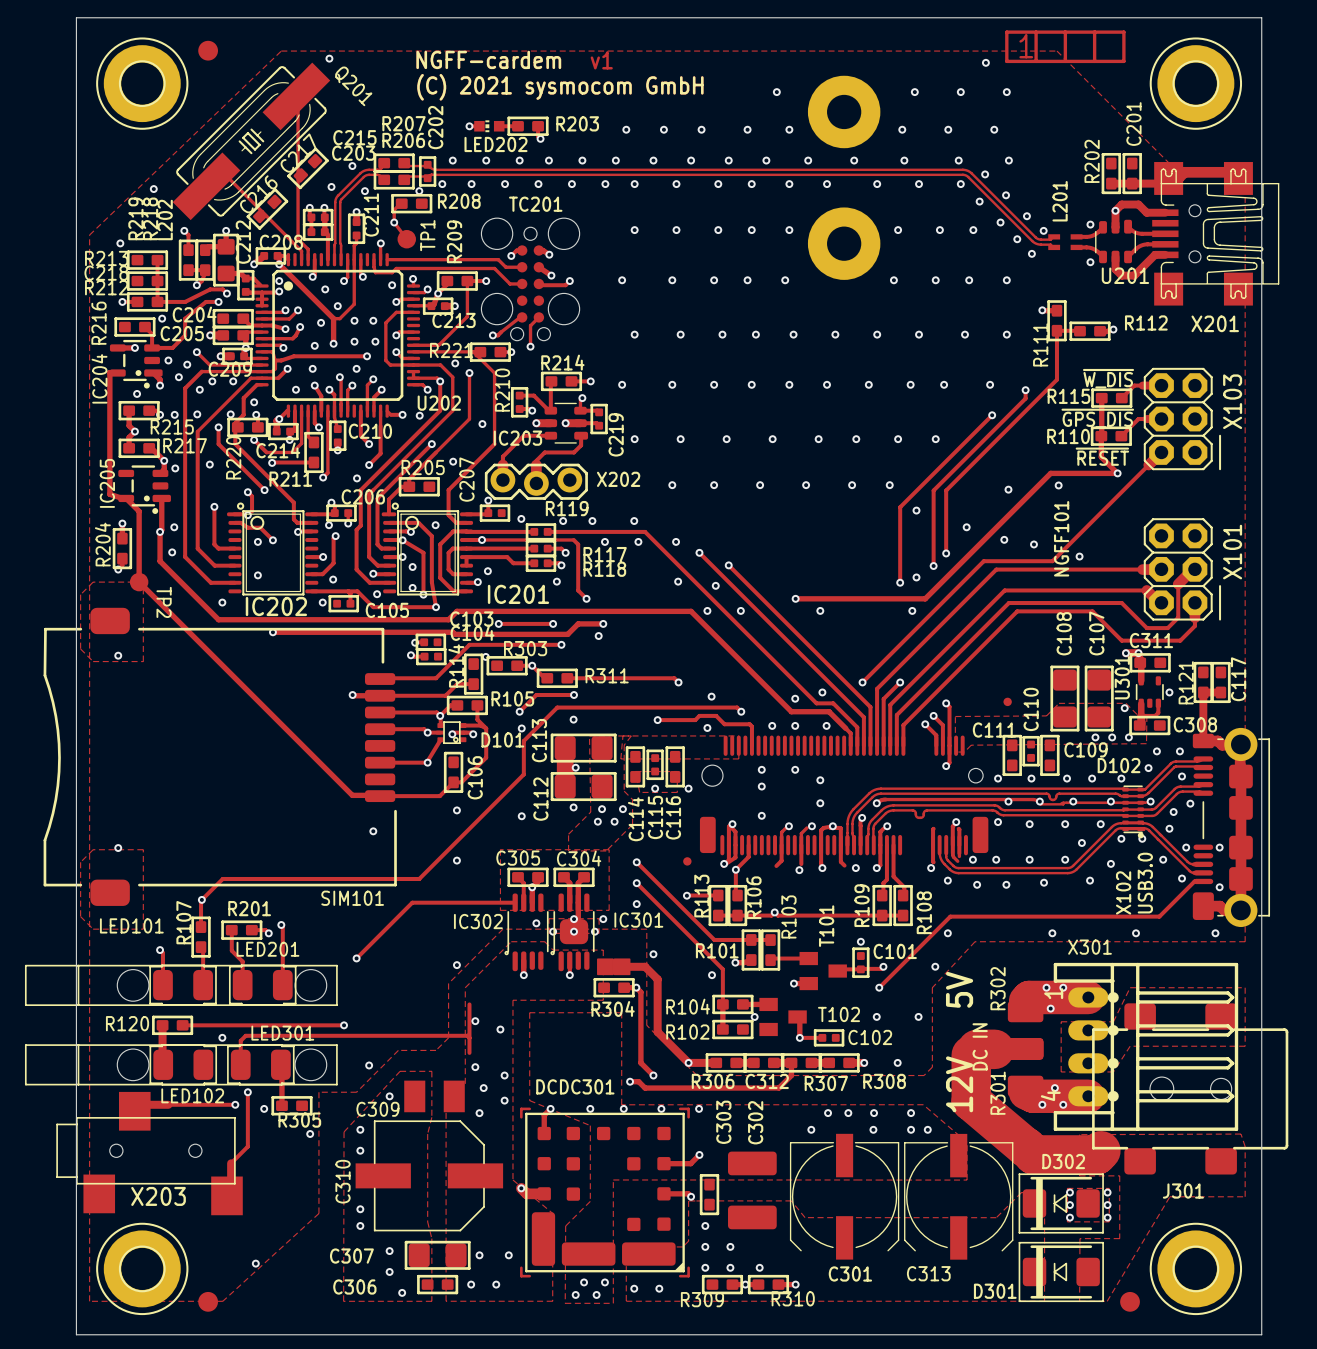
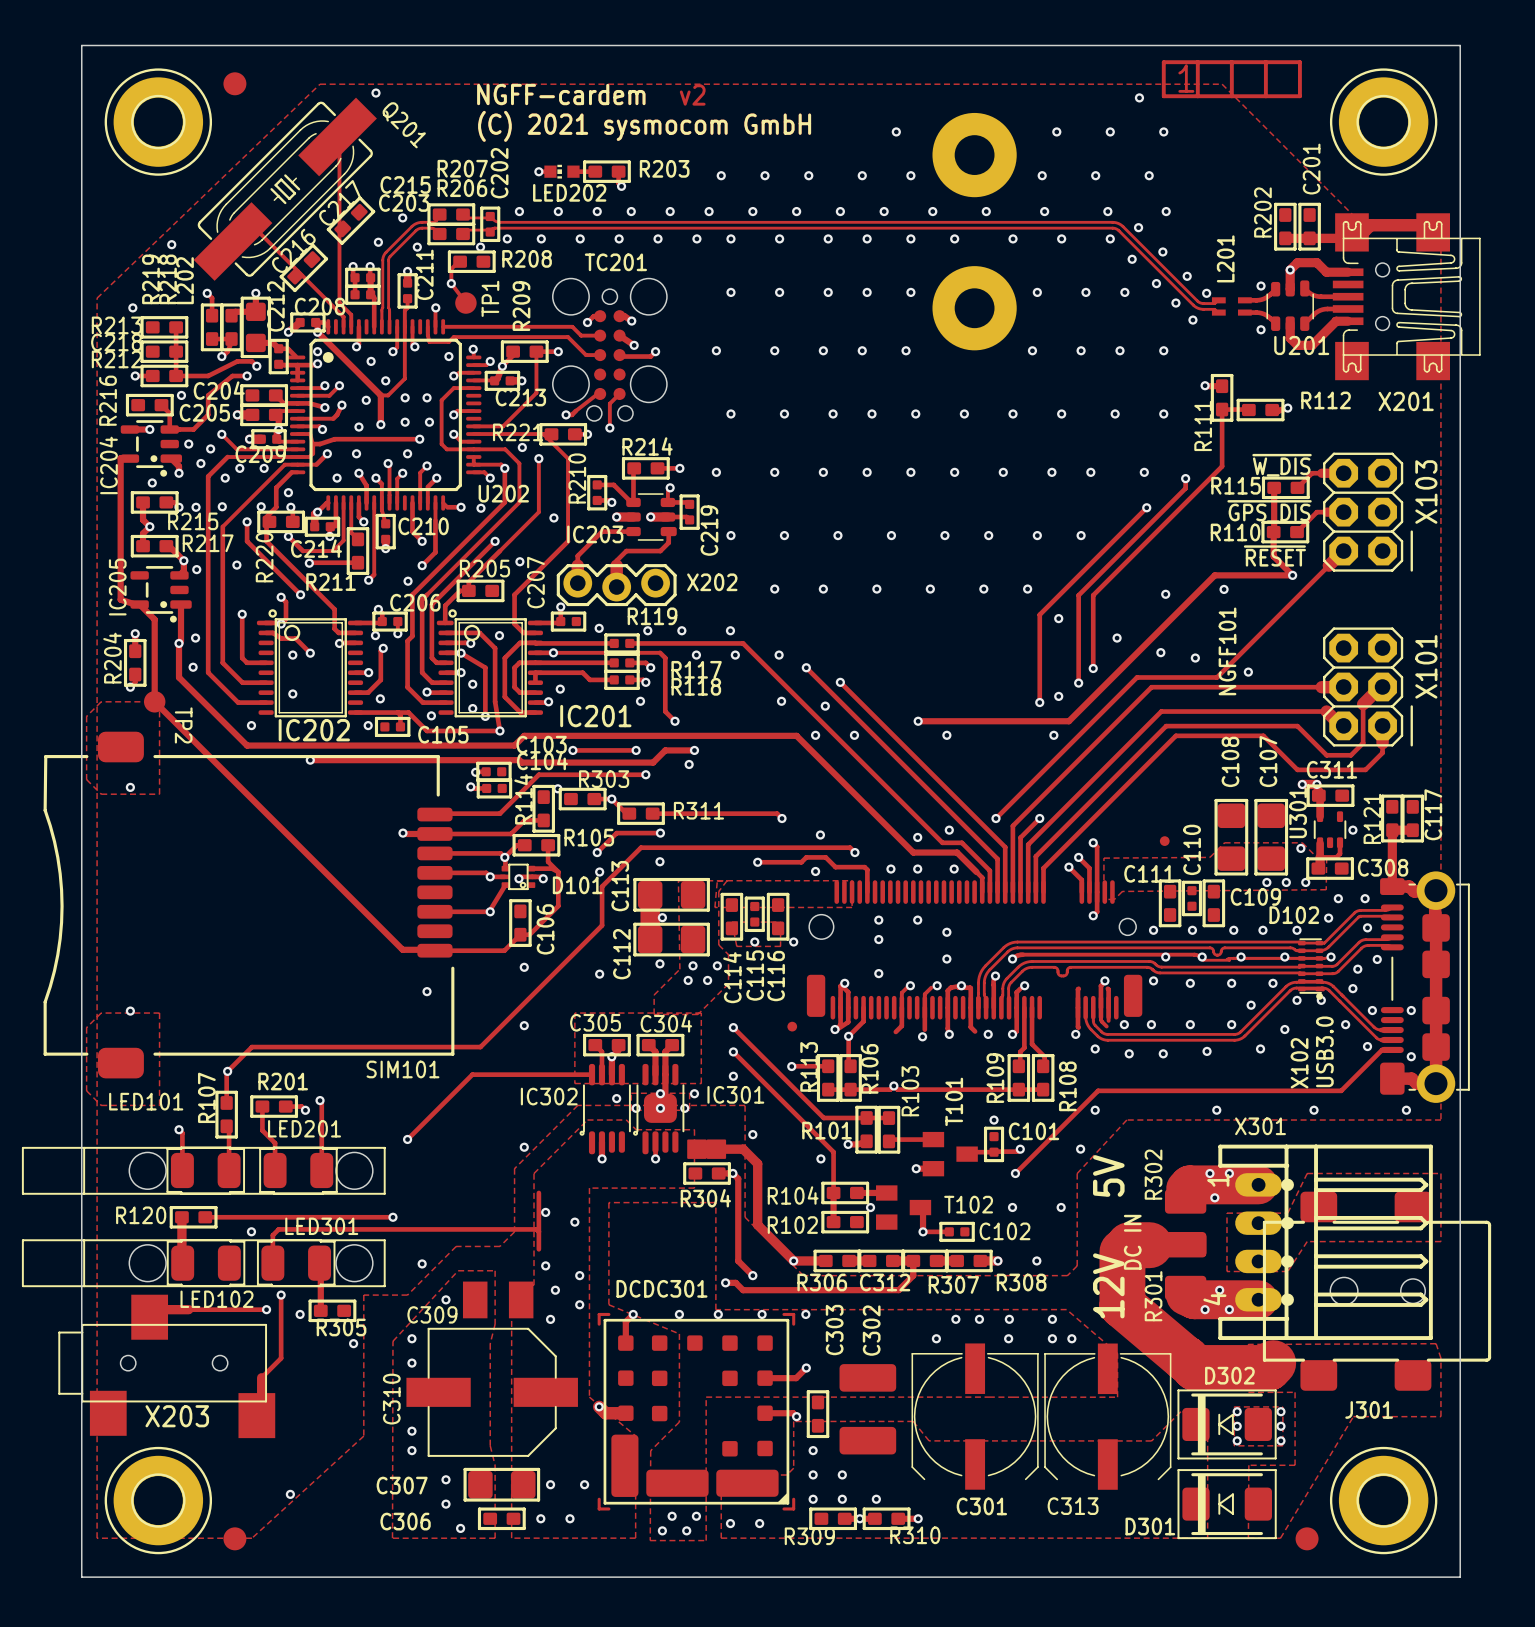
text: v1 (601, 60) -> v2 (692, 95)

